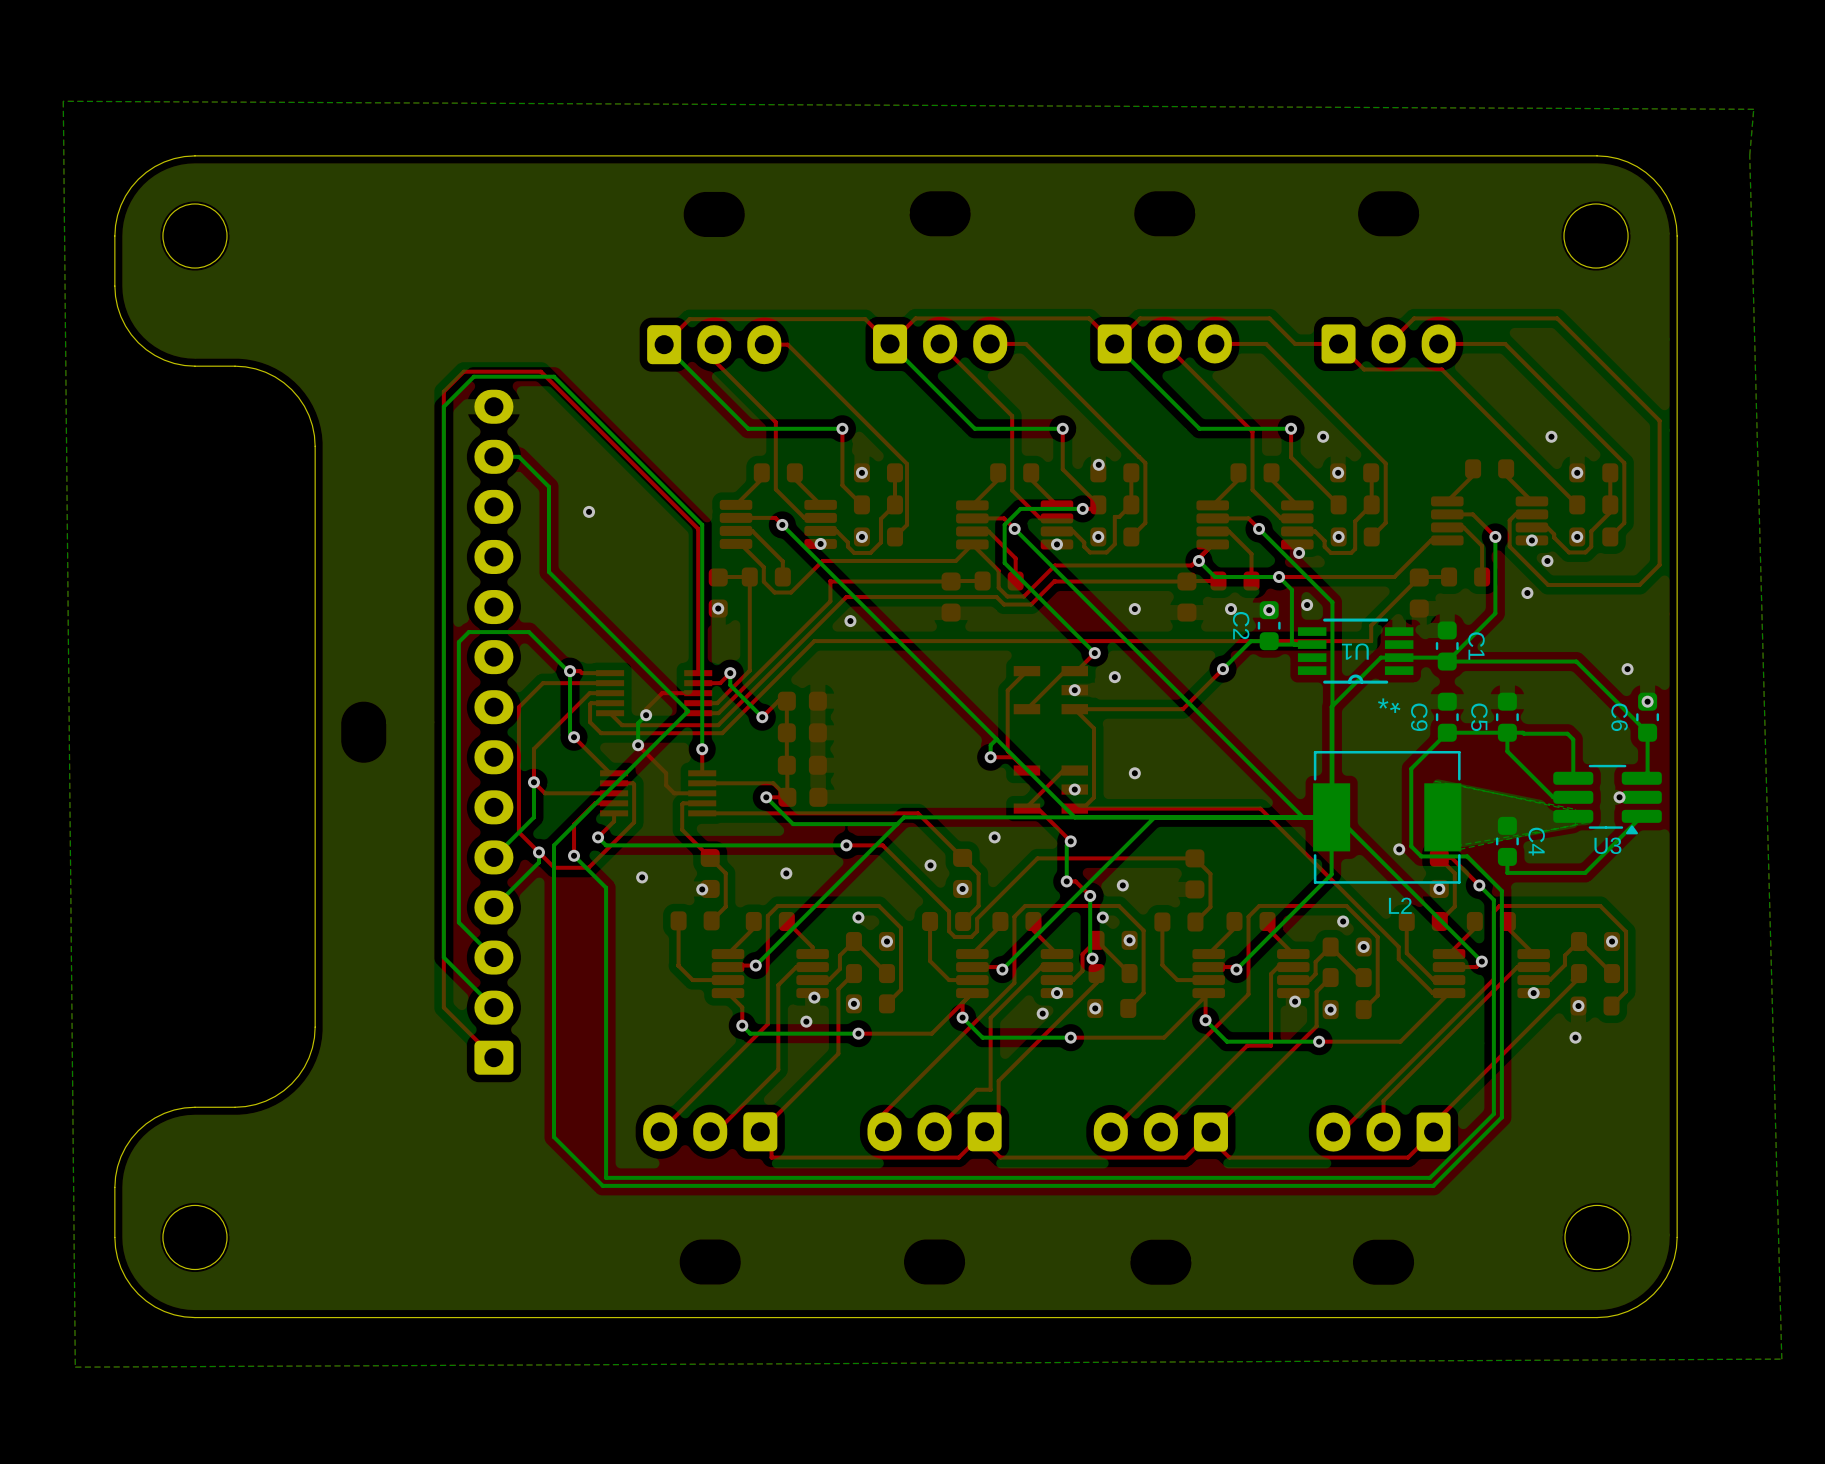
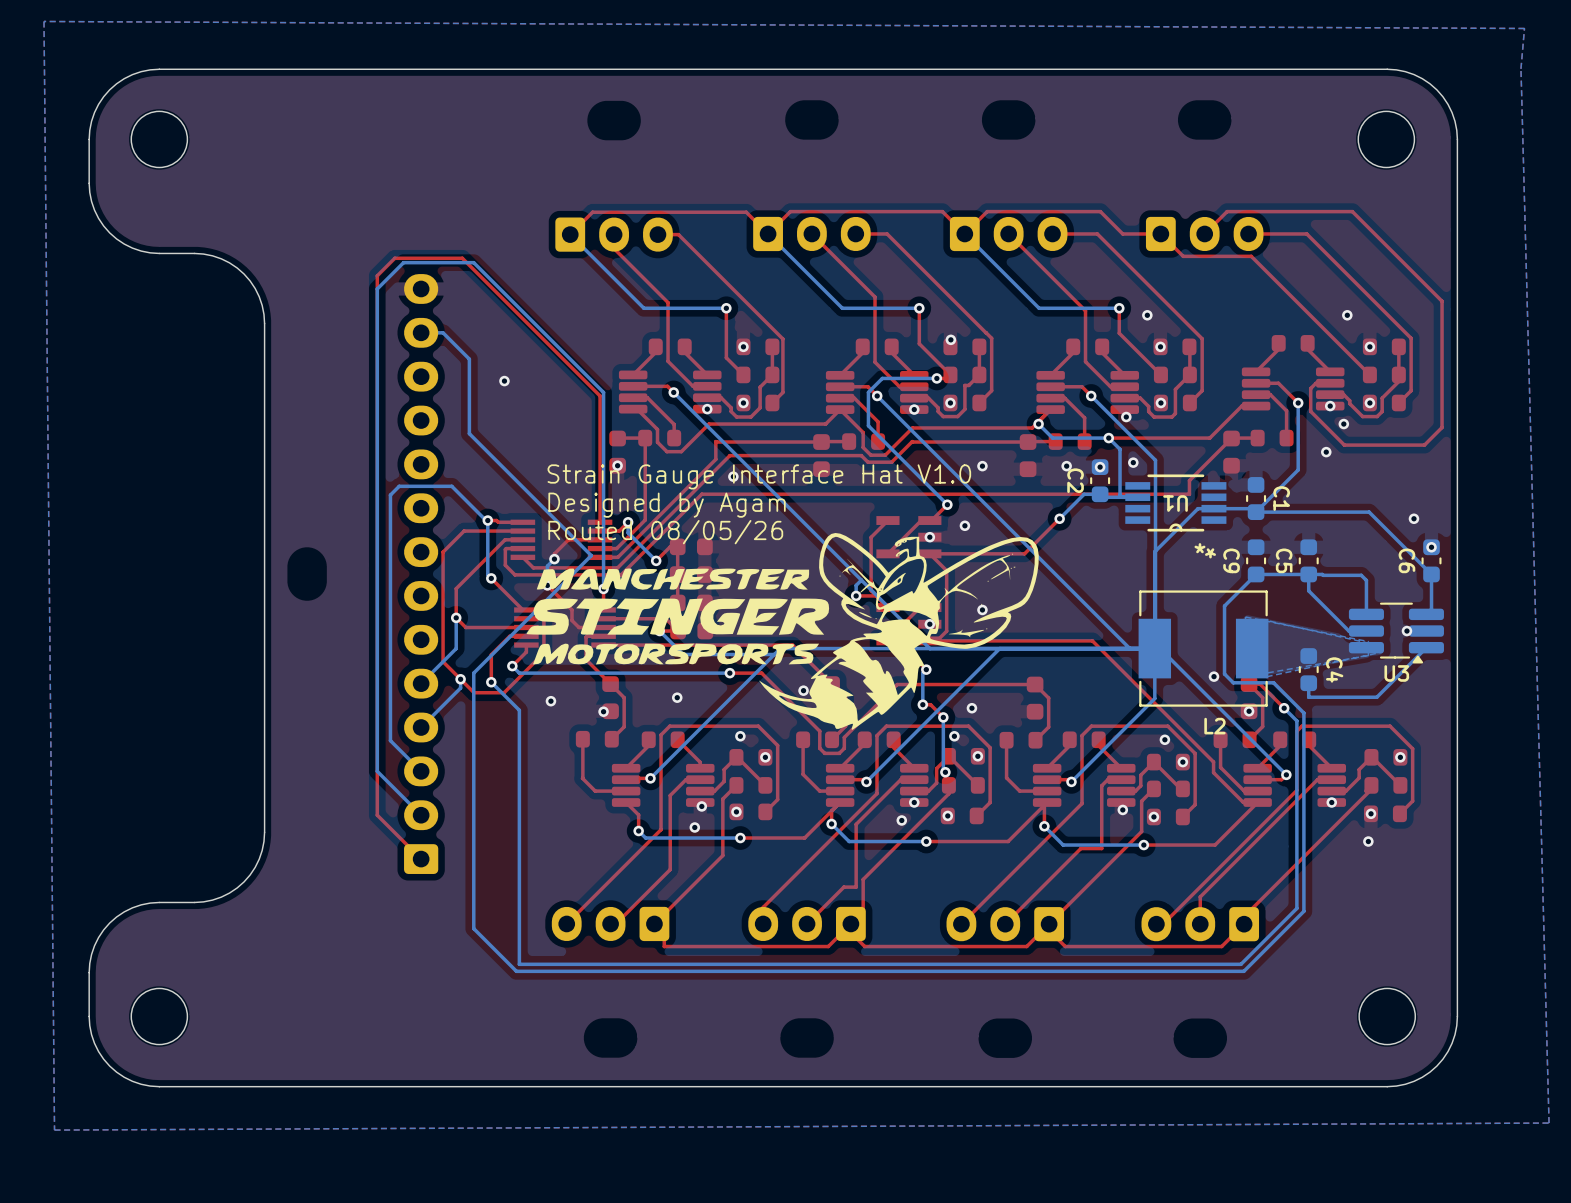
text: none -> Strain Gauge Interface Hat V1.0 (759, 476)
text: none -> Designed by Agam (667, 505)
text: none -> Routed 08/05/26 (665, 532)
drawing: none -> [526, 532, 1039, 730]

